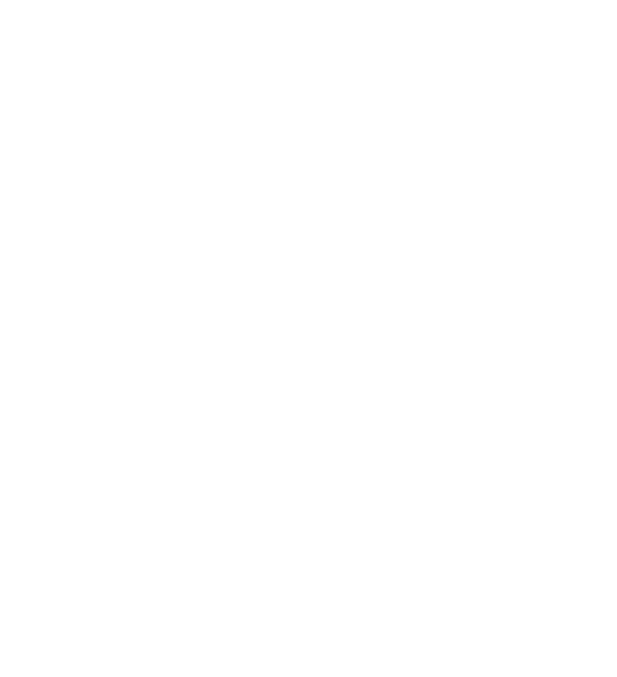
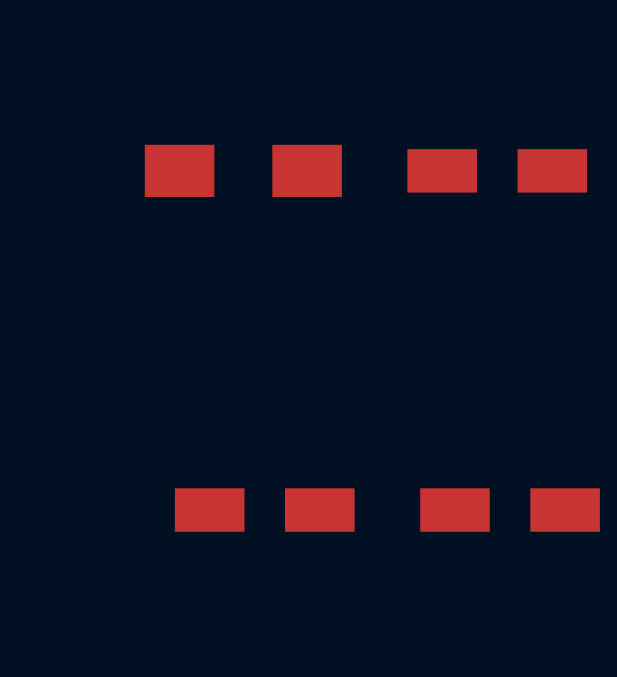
part: none -> (243, 170)
part: none -> (497, 170)
part: none -> (264, 510)
part: none -> (510, 510)

